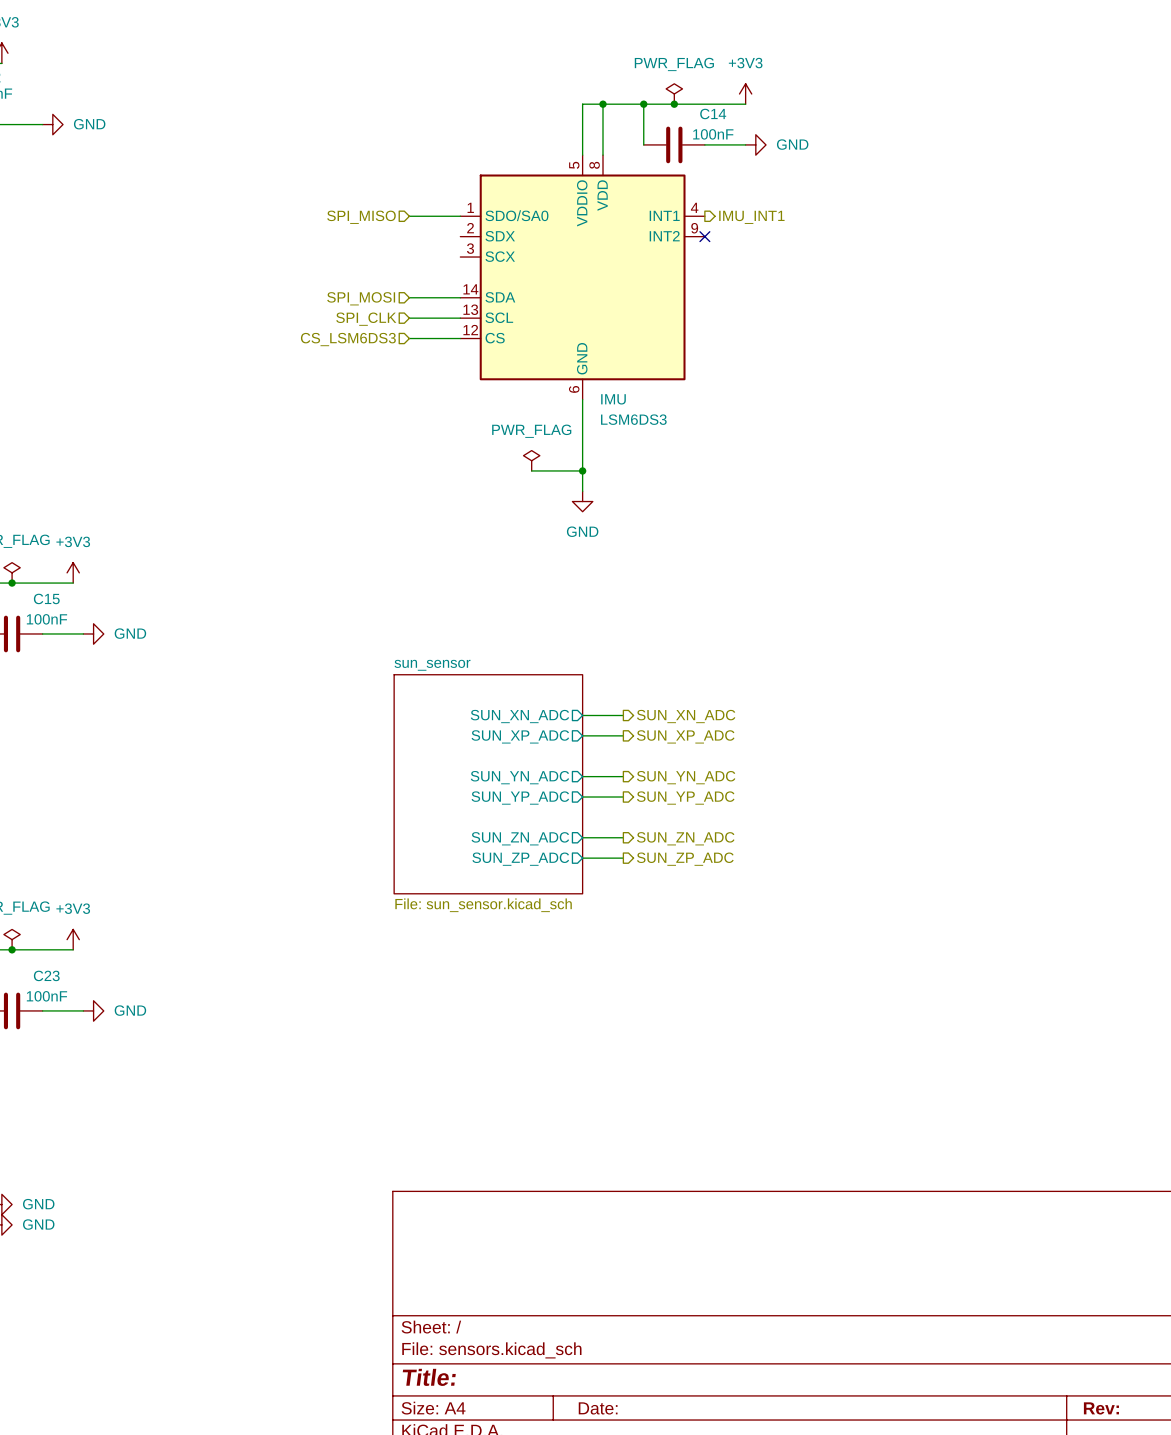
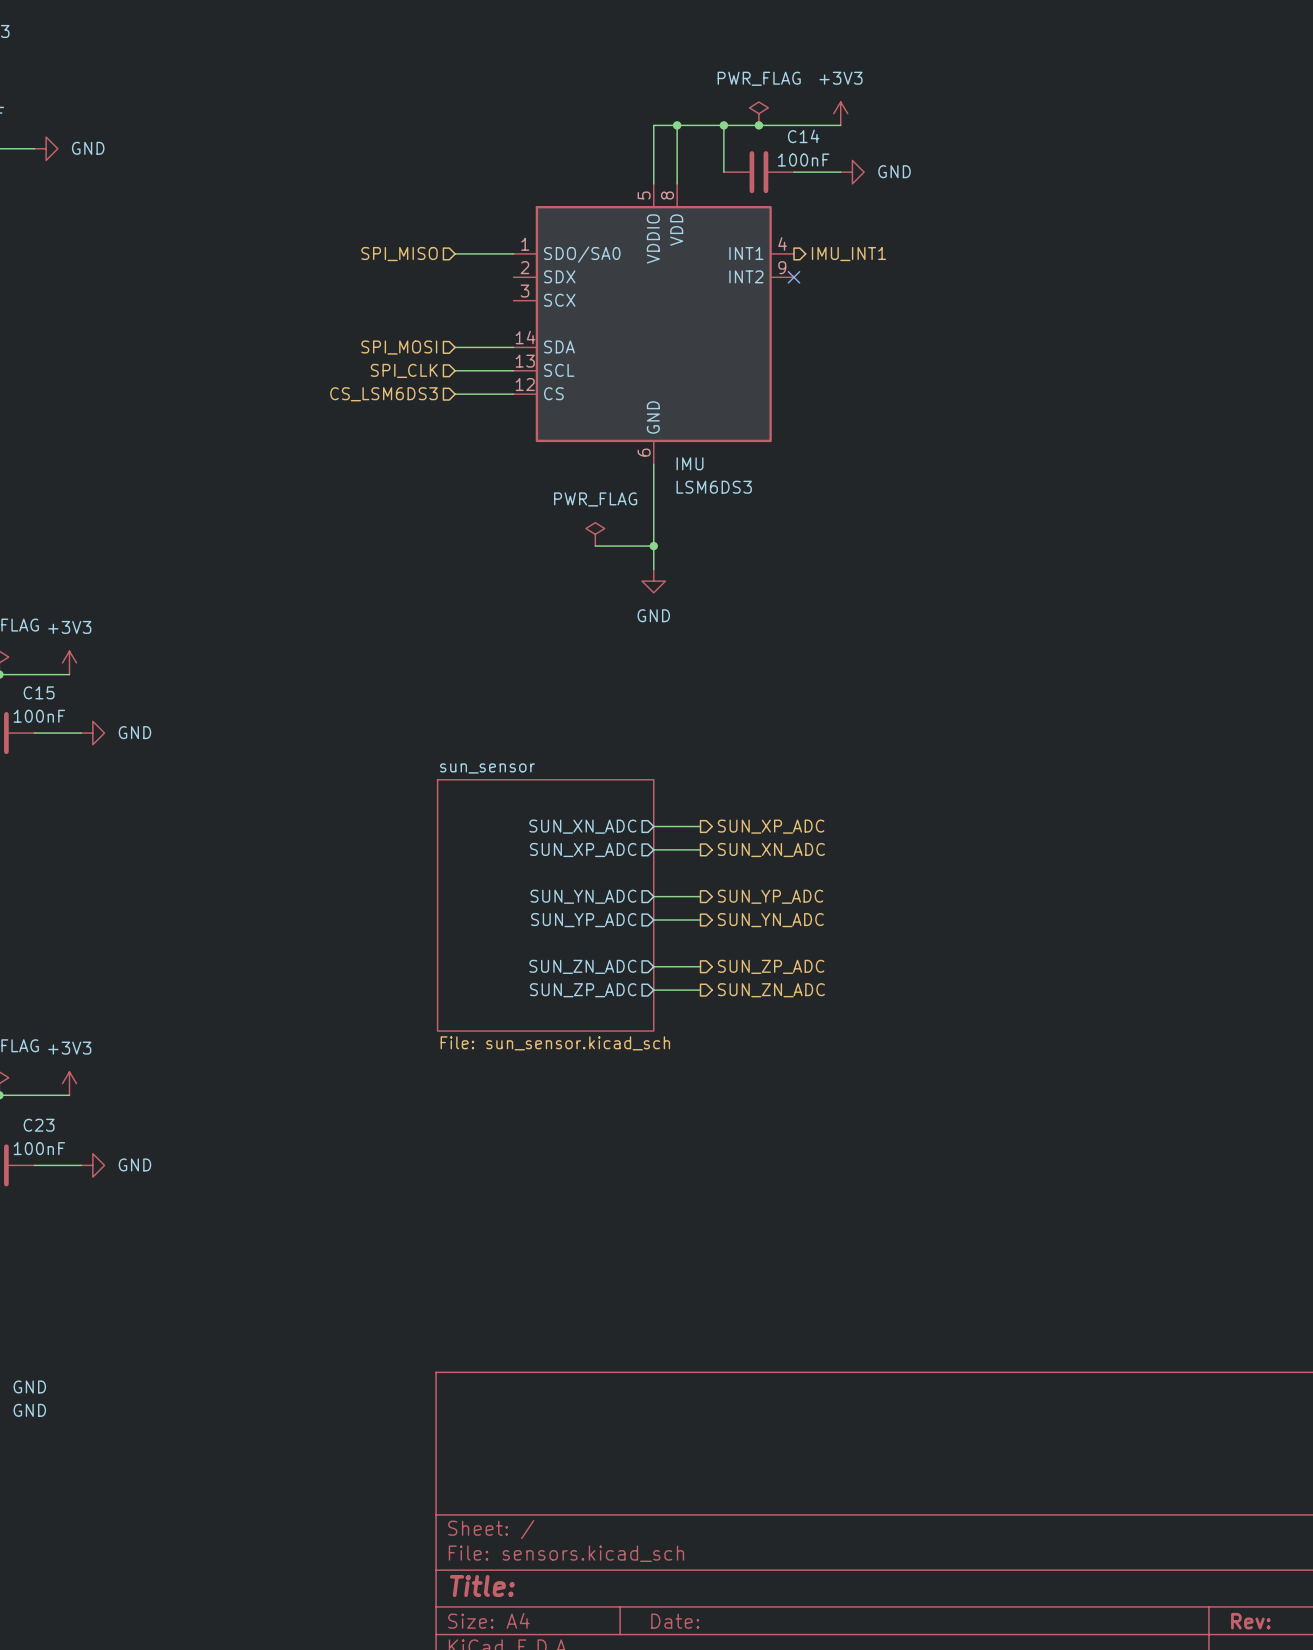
hierarchical label: SUN_XN_ADC (686, 716) -> SUN_XP_ADC (771, 826)
hierarchical label: SUN_XP_ADC (685, 736) -> SUN_XN_ADC (771, 850)
hierarchical label: SUN_YN_ADC (686, 777) -> SUN_YP_ADC (770, 896)
hierarchical label: SUN_YP_ADC (685, 798) -> SUN_YN_ADC (770, 920)
hierarchical label: SUN_ZN_ADC (685, 838) -> SUN_ZP_ADC (771, 966)
hierarchical label: SUN_ZP_ADC (685, 859) -> SUN_ZN_ADC (771, 990)

